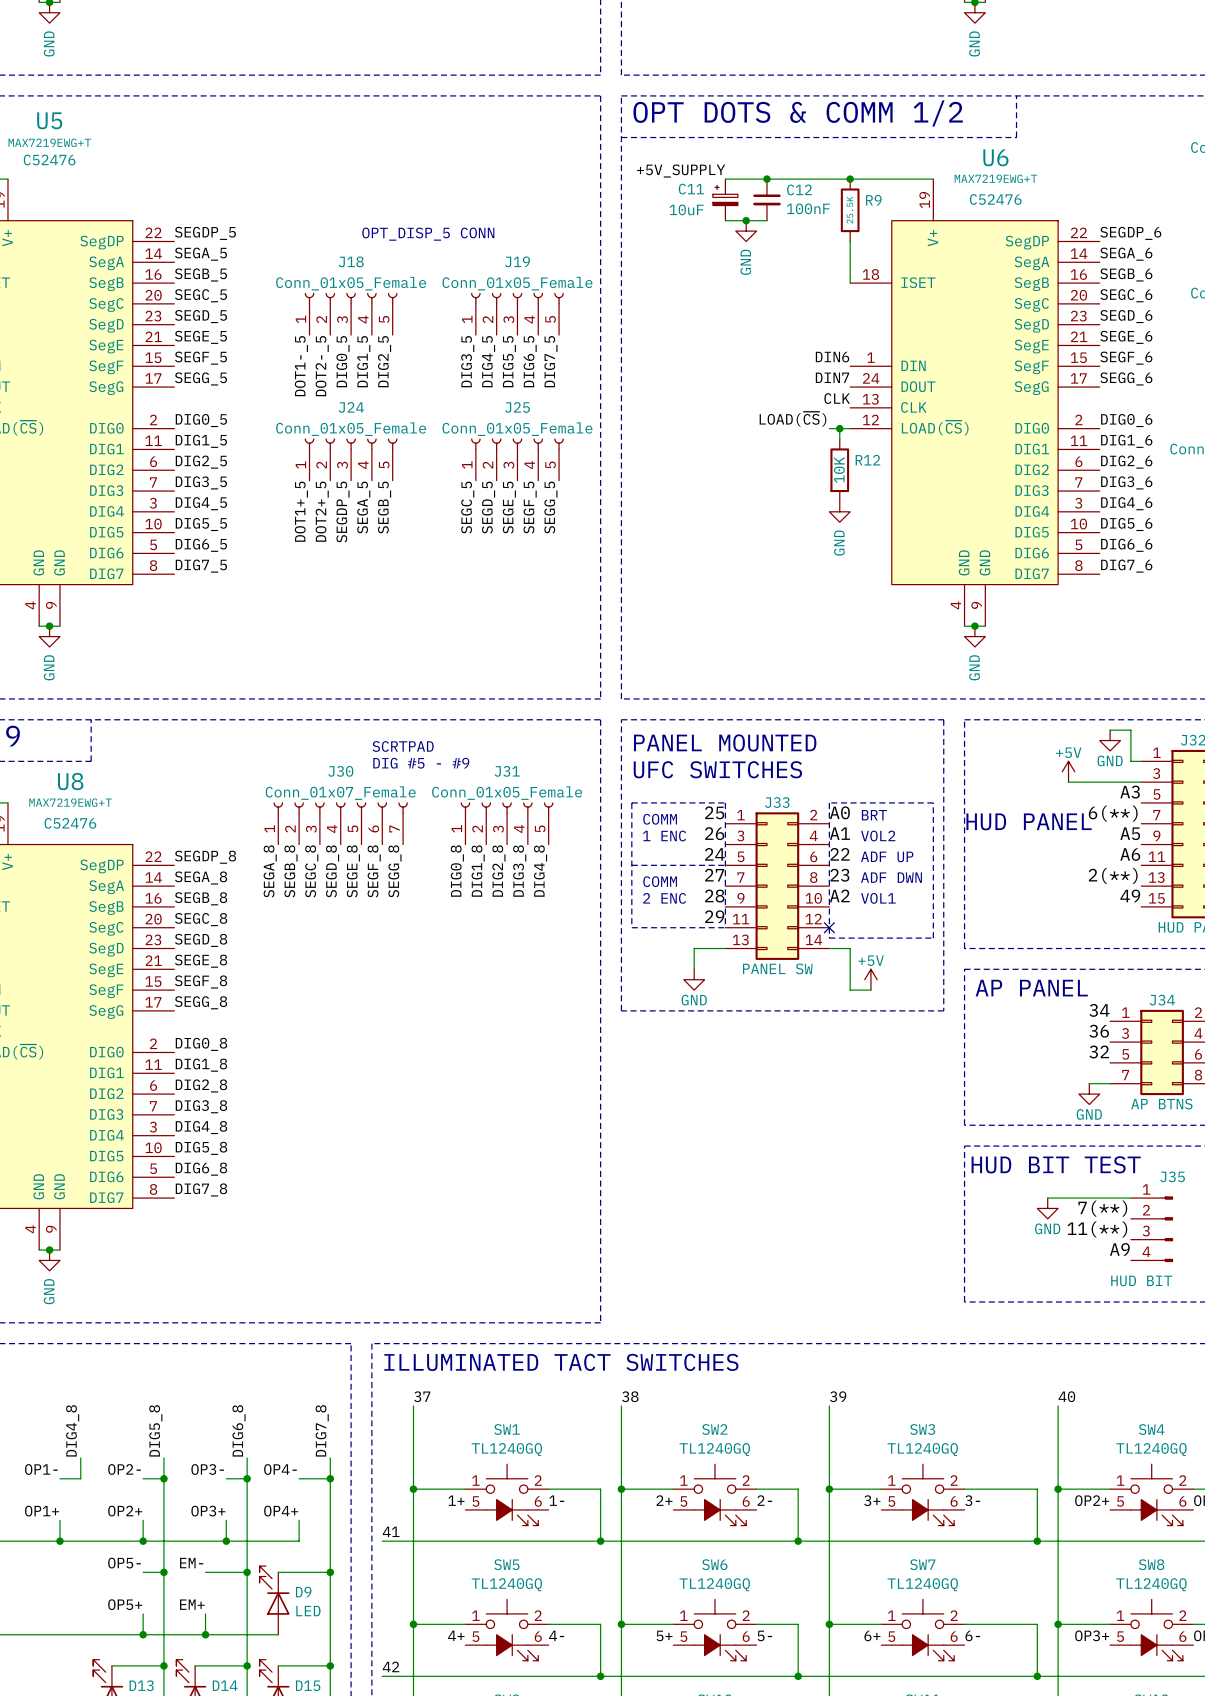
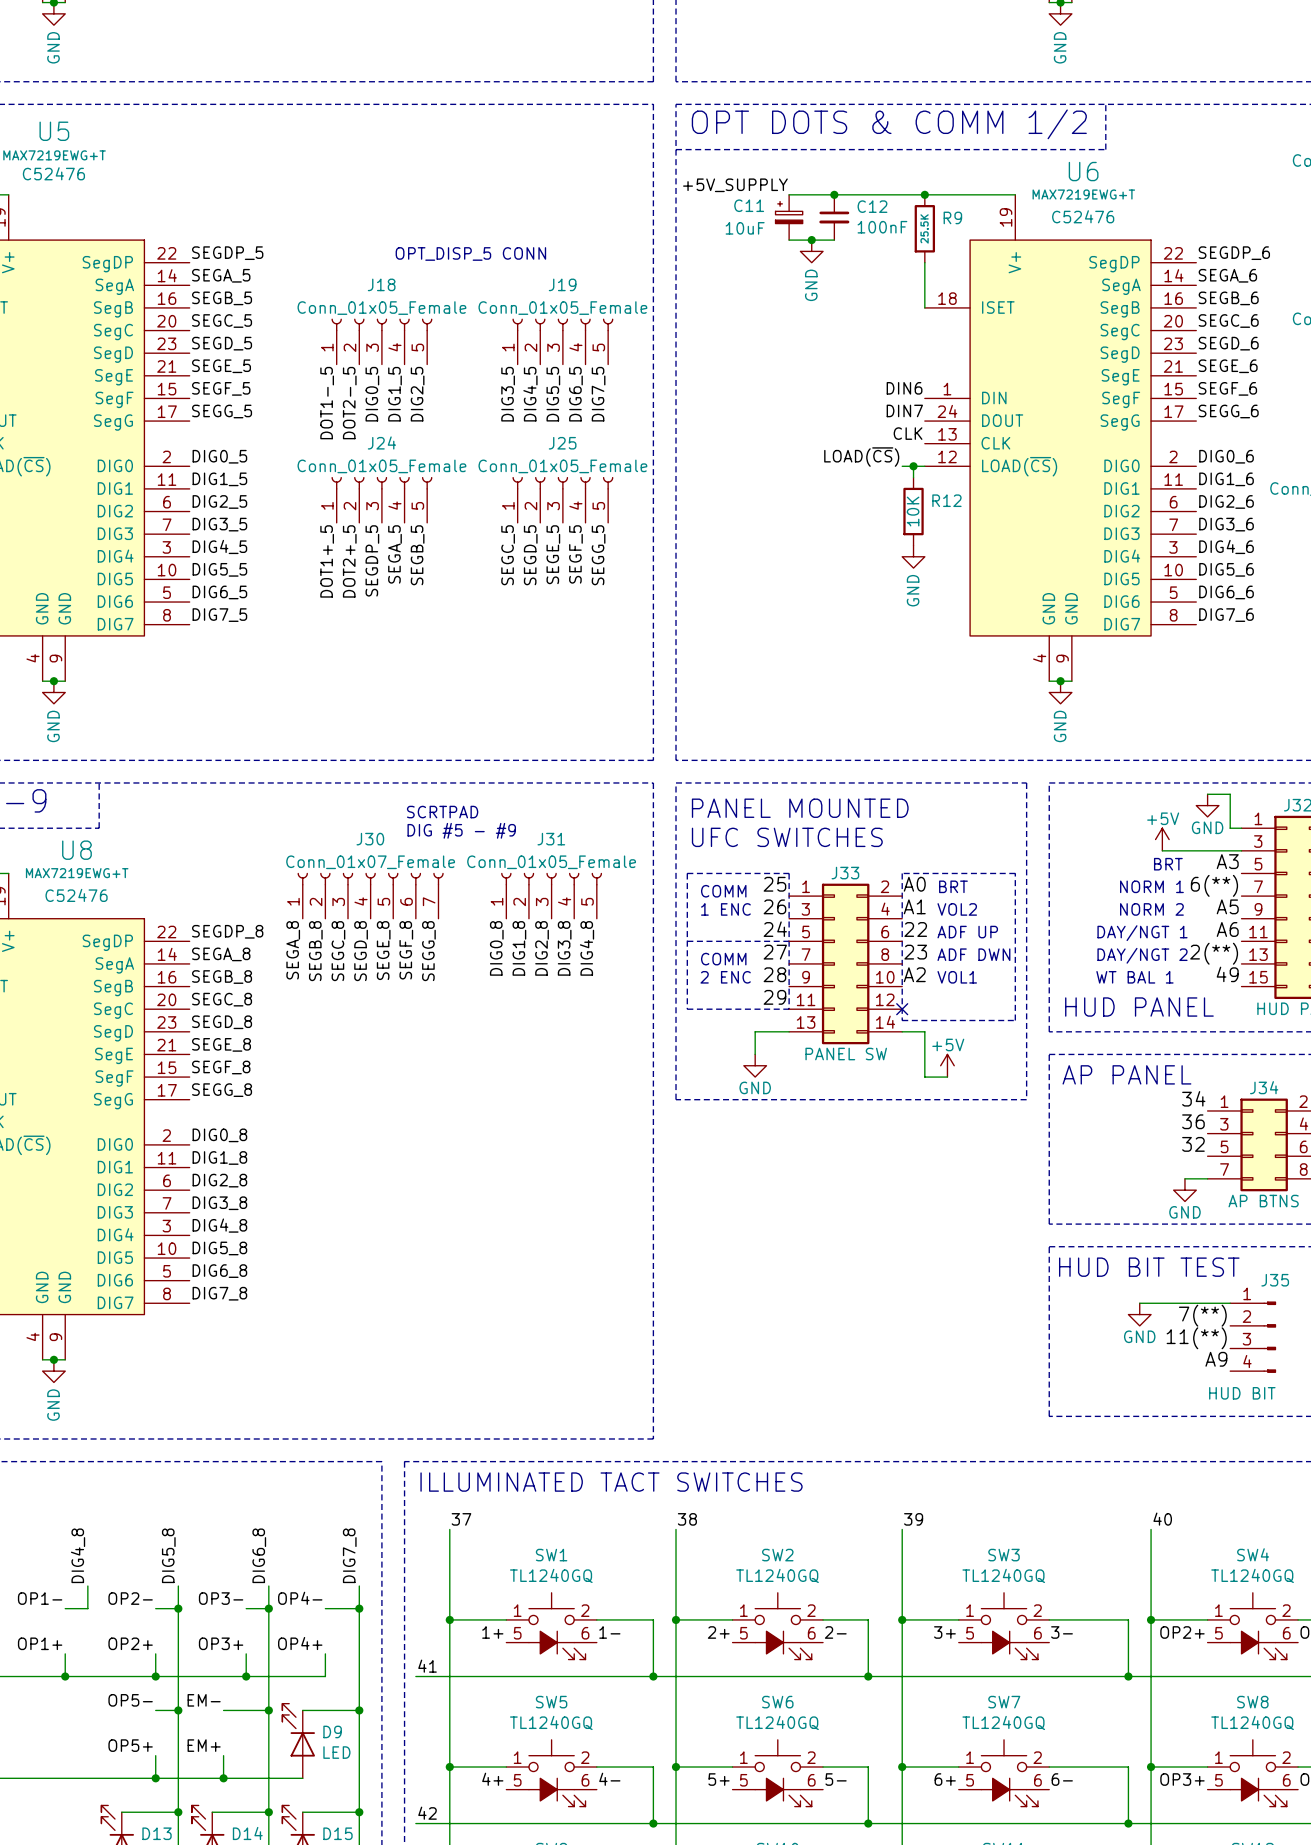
text: none -> BRT (1168, 864)
text: none -> NORM 1 (1151, 886)
text position: HUD PANEL (1029, 821) -> HUD PANEL (1139, 1007)
text: none -> NORM 2 (1151, 909)
text: none -> DAY/NGT 1 (1142, 933)
text: none -> DAY/NGT 2 (1142, 955)
text: none -> WT BAL 1 (1134, 977)

